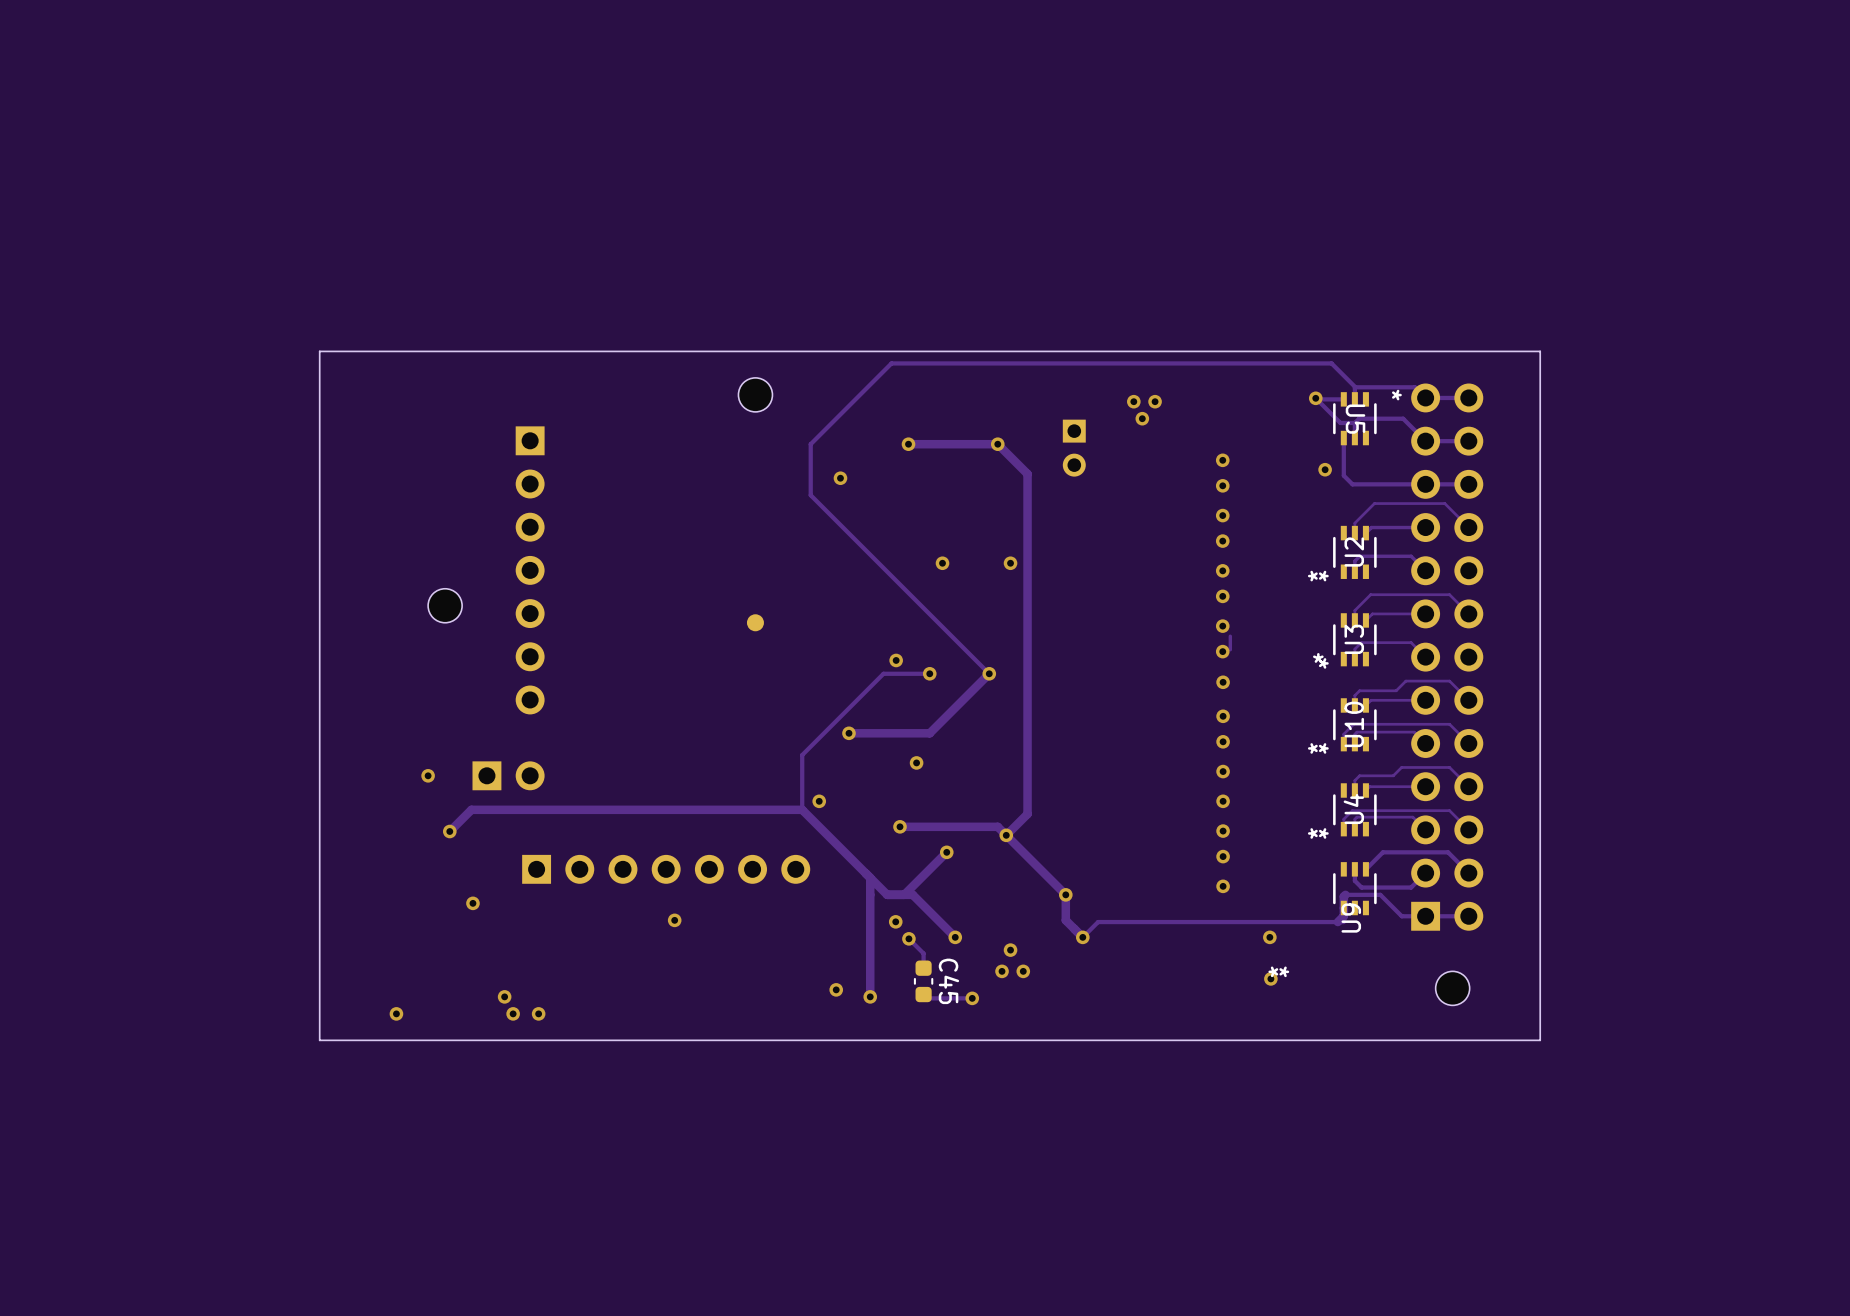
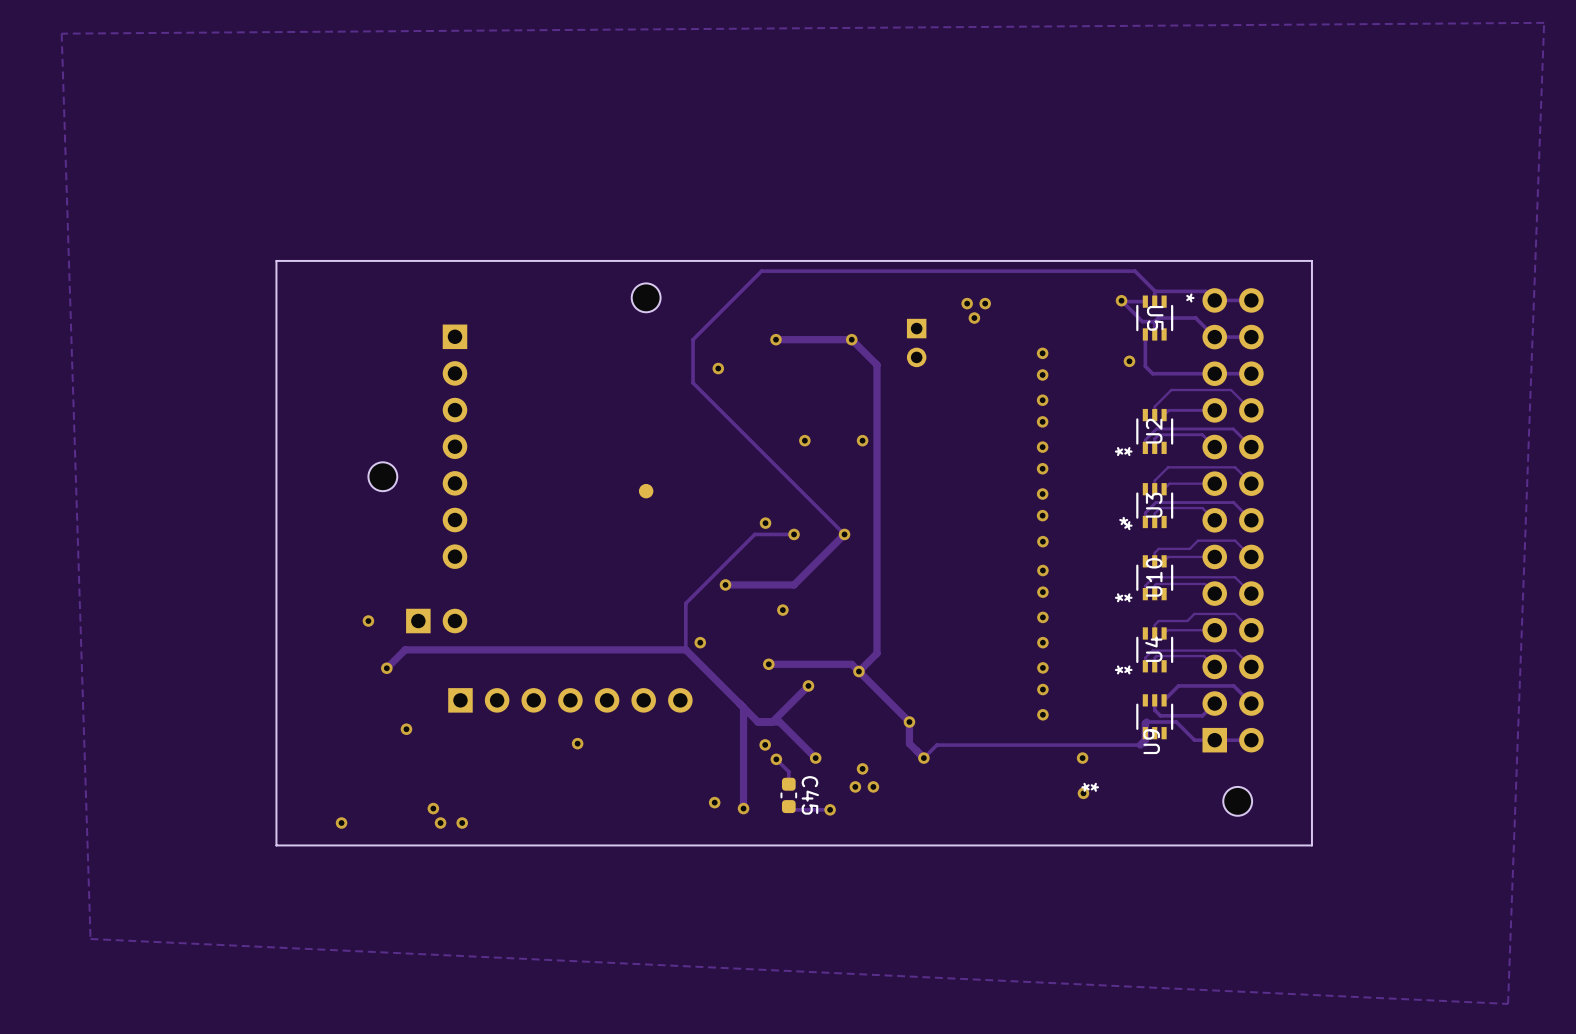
zone outline: none -> (1544, 22) (61, 33) (90, 938) (1508, 1003) (1544, 22)
track: none -> (1251, 447) (1233, 428) (1156, 428) (1145, 440) (1145, 447)
track: (1230, 636) (1230, 649) -> none
track: none -> (1251, 520) (1233, 502) (1155, 502) (1145, 512) (1145, 521)

